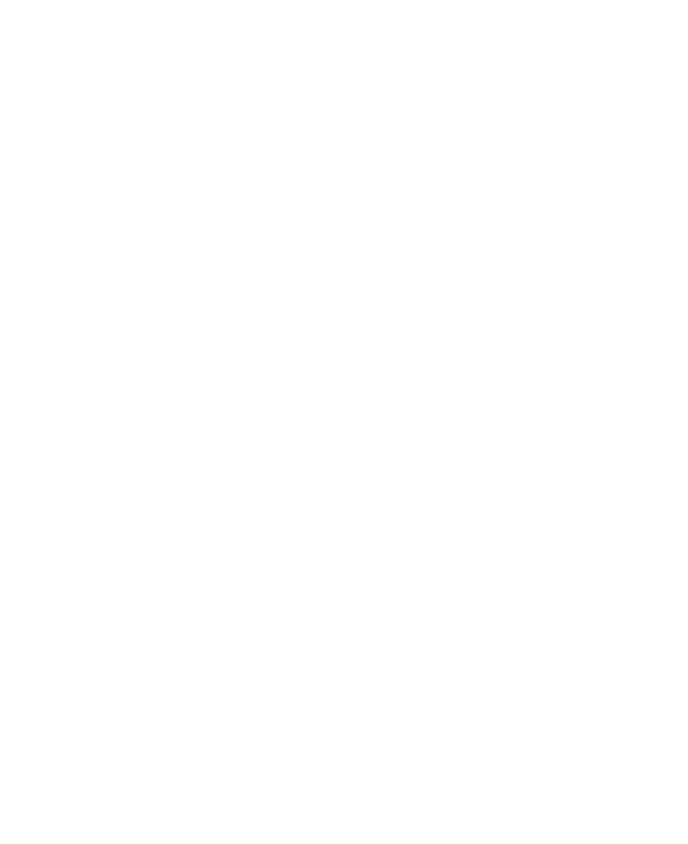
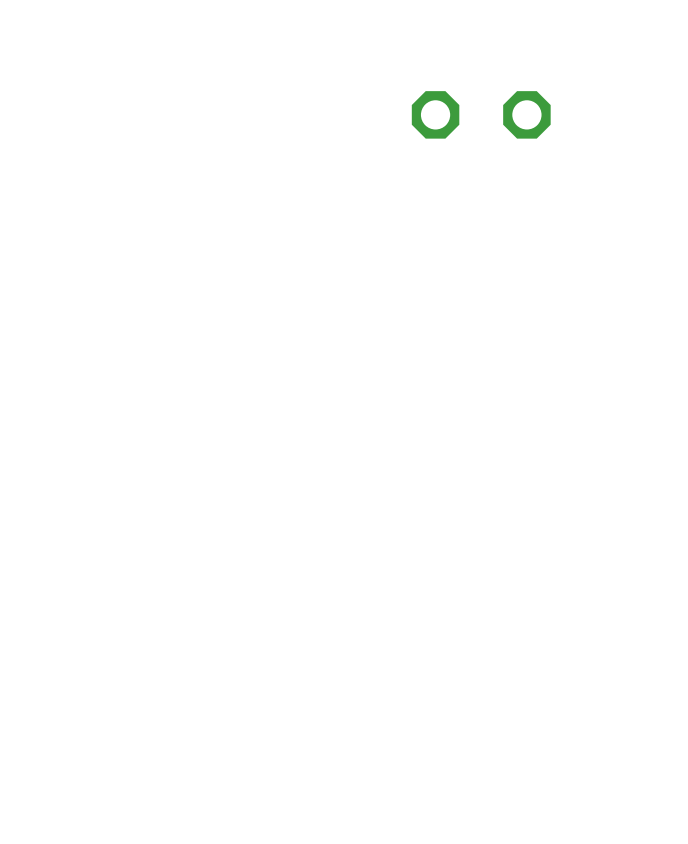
part: none -> (481, 114)

